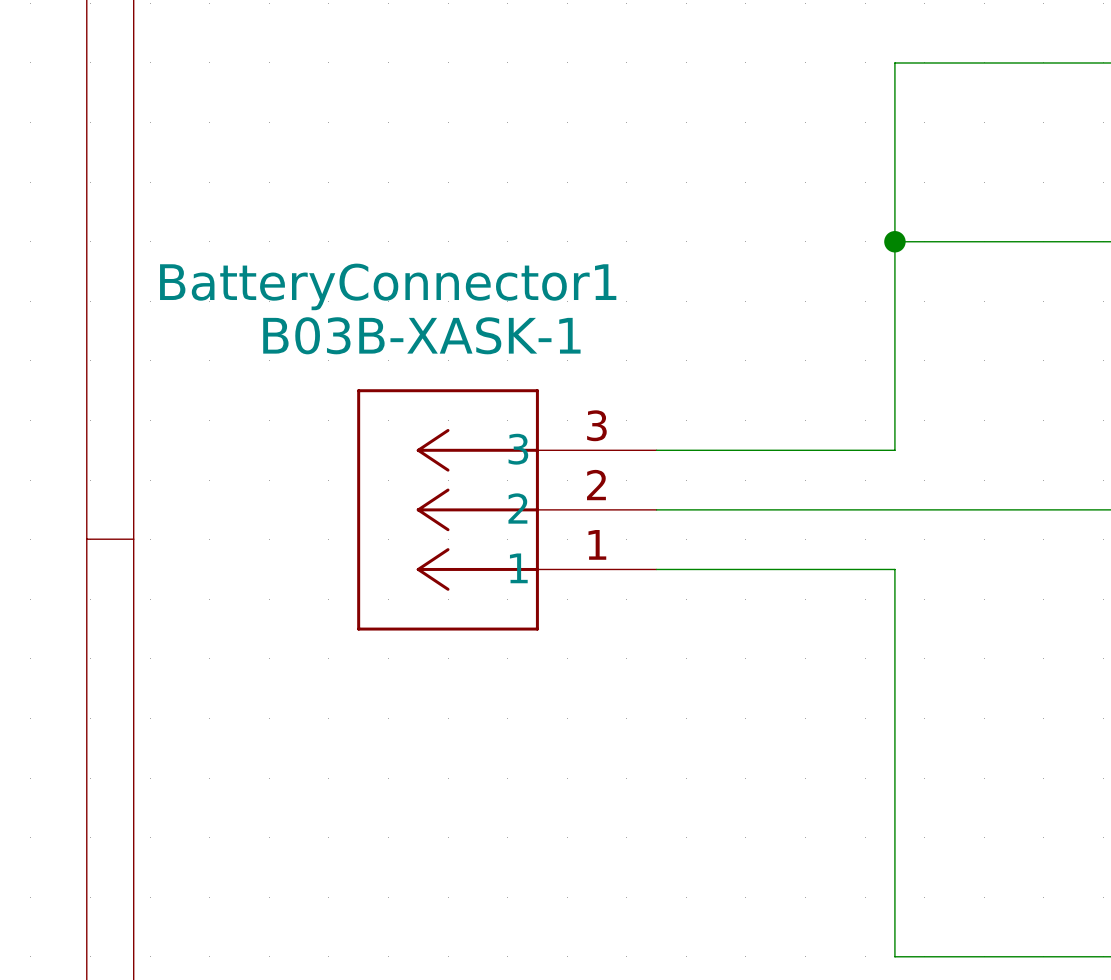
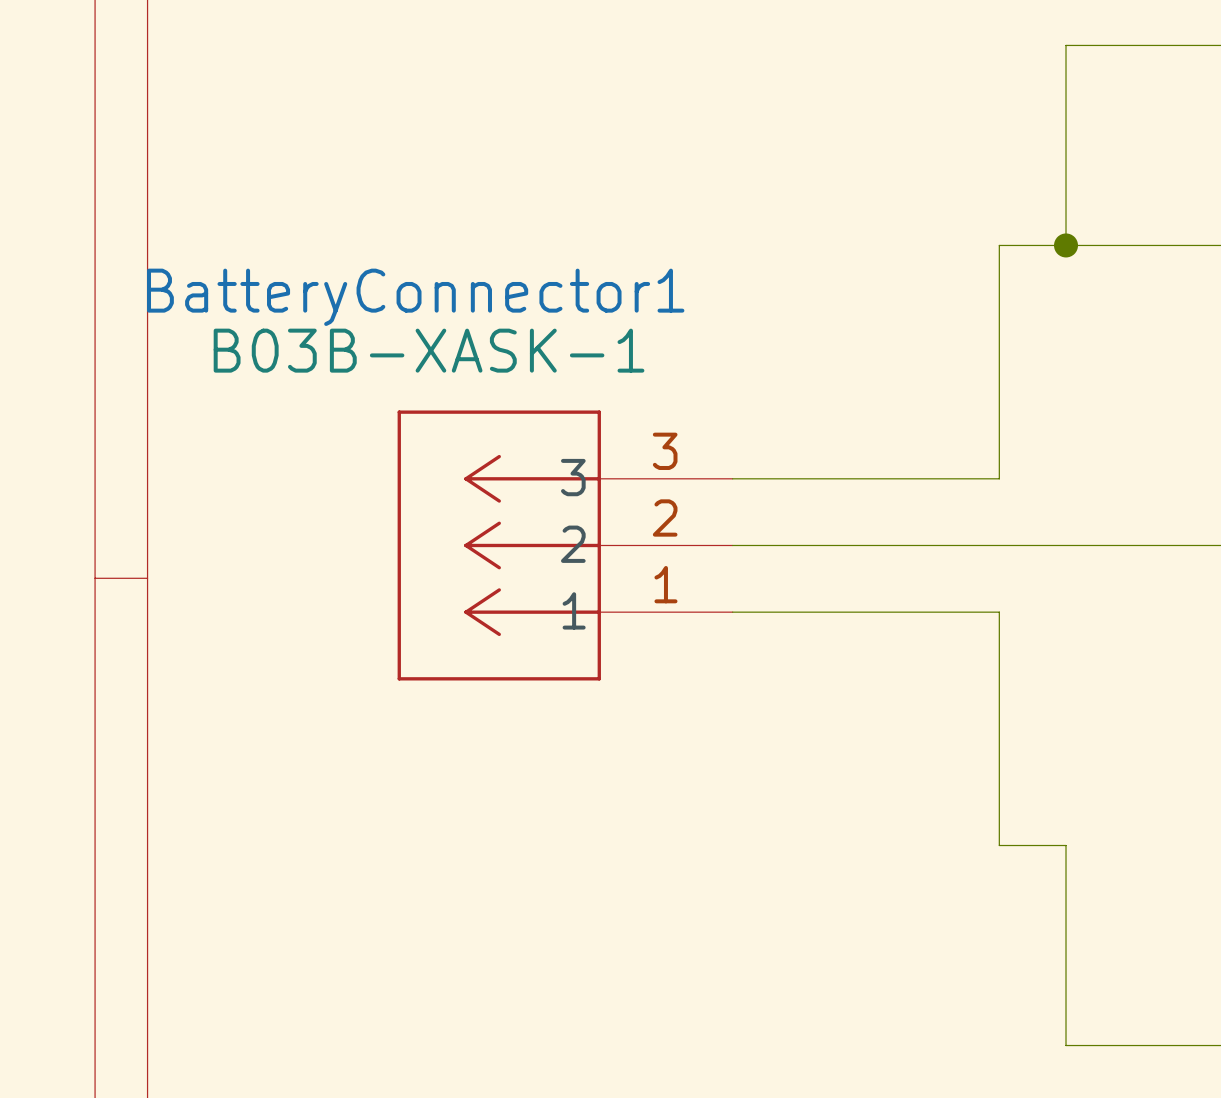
wire: (954, 62) (894, 62) (894, 241) -> (1066, 45) (1066, 245)
junction position: (894, 241) -> (1066, 245)
wire: (894, 778) (894, 956) (954, 956) -> (999, 845) (1066, 845) (1066, 1045)

